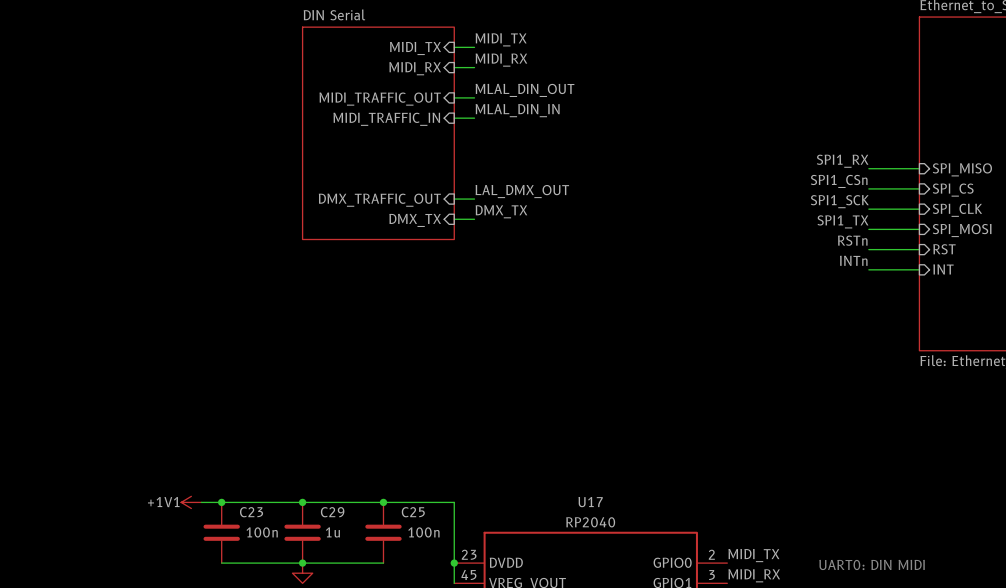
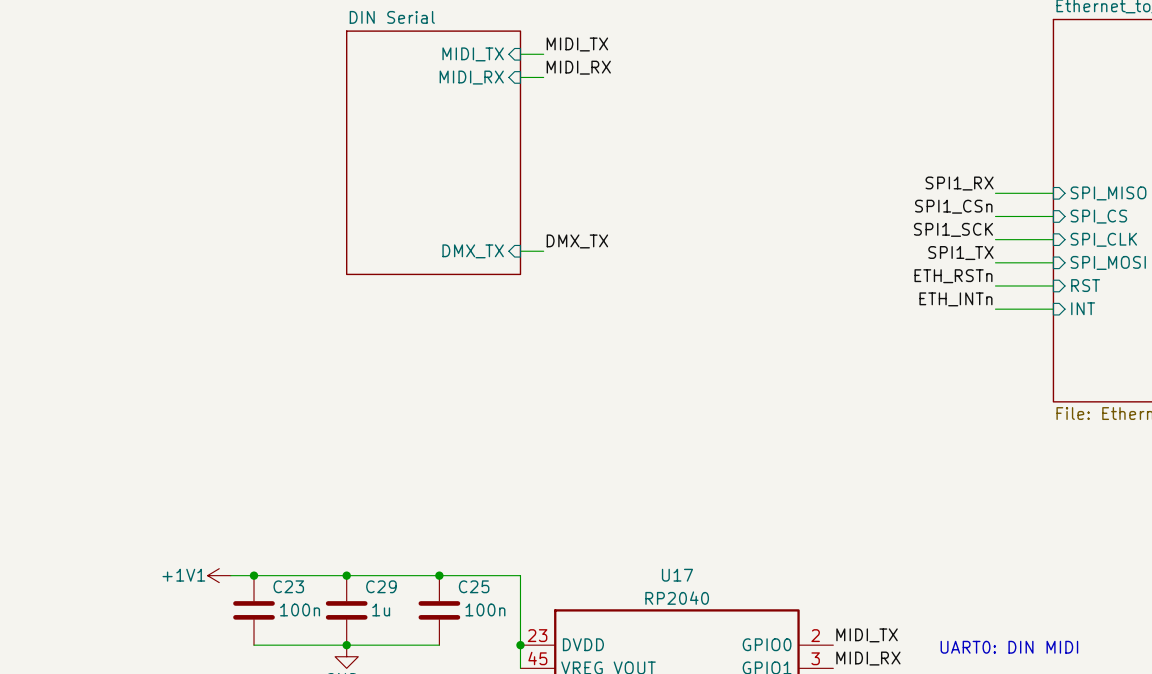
label: MLAL_DIN_OUT (525, 90) -> none
wire: (454, 97) (474, 97) -> none
sheet pin: MIDI_TRAFFIC_OUT (380, 99) -> none
label: MLAL_DIN_IN (517, 110) -> none
wire: (454, 118) (474, 118) -> none
sheet pin: MIDI_TRAFFIC_IN (386, 119) -> none
label: LAL_DMX_OUT (522, 191) -> none
wire: (454, 199) (474, 199) -> none
sheet pin: DMX_TRAFFIC_OUT (379, 200) -> none
label: RSTn (852, 240) -> ETH_RSTn (953, 276)
label: INTn (853, 260) -> ETH_INTn (955, 299)

